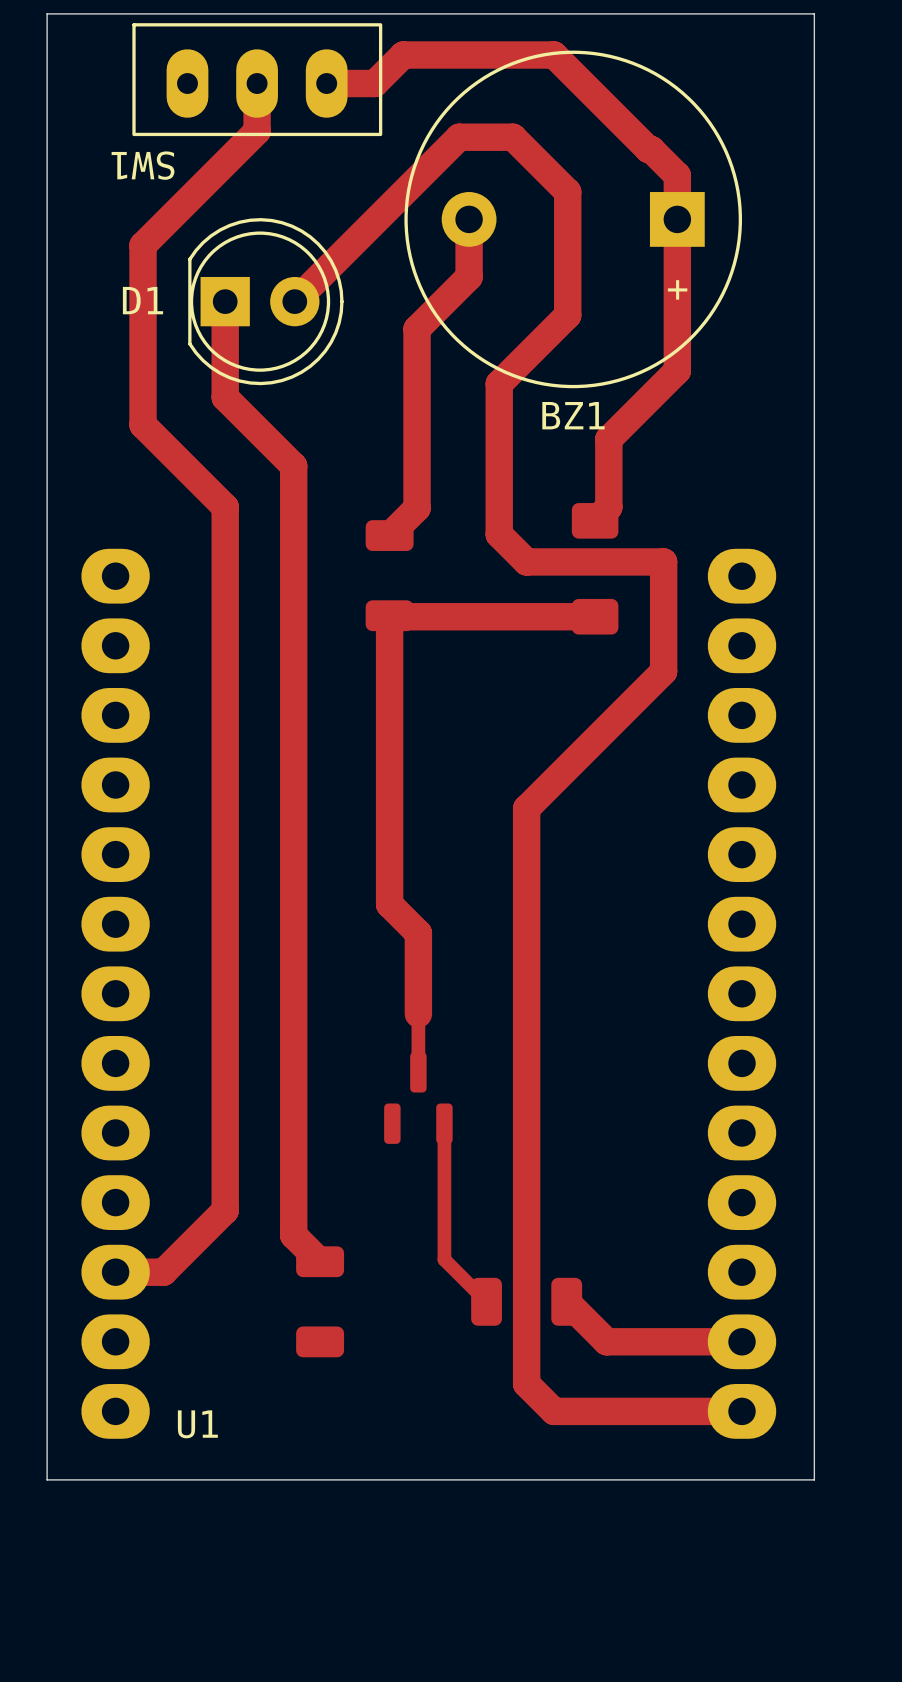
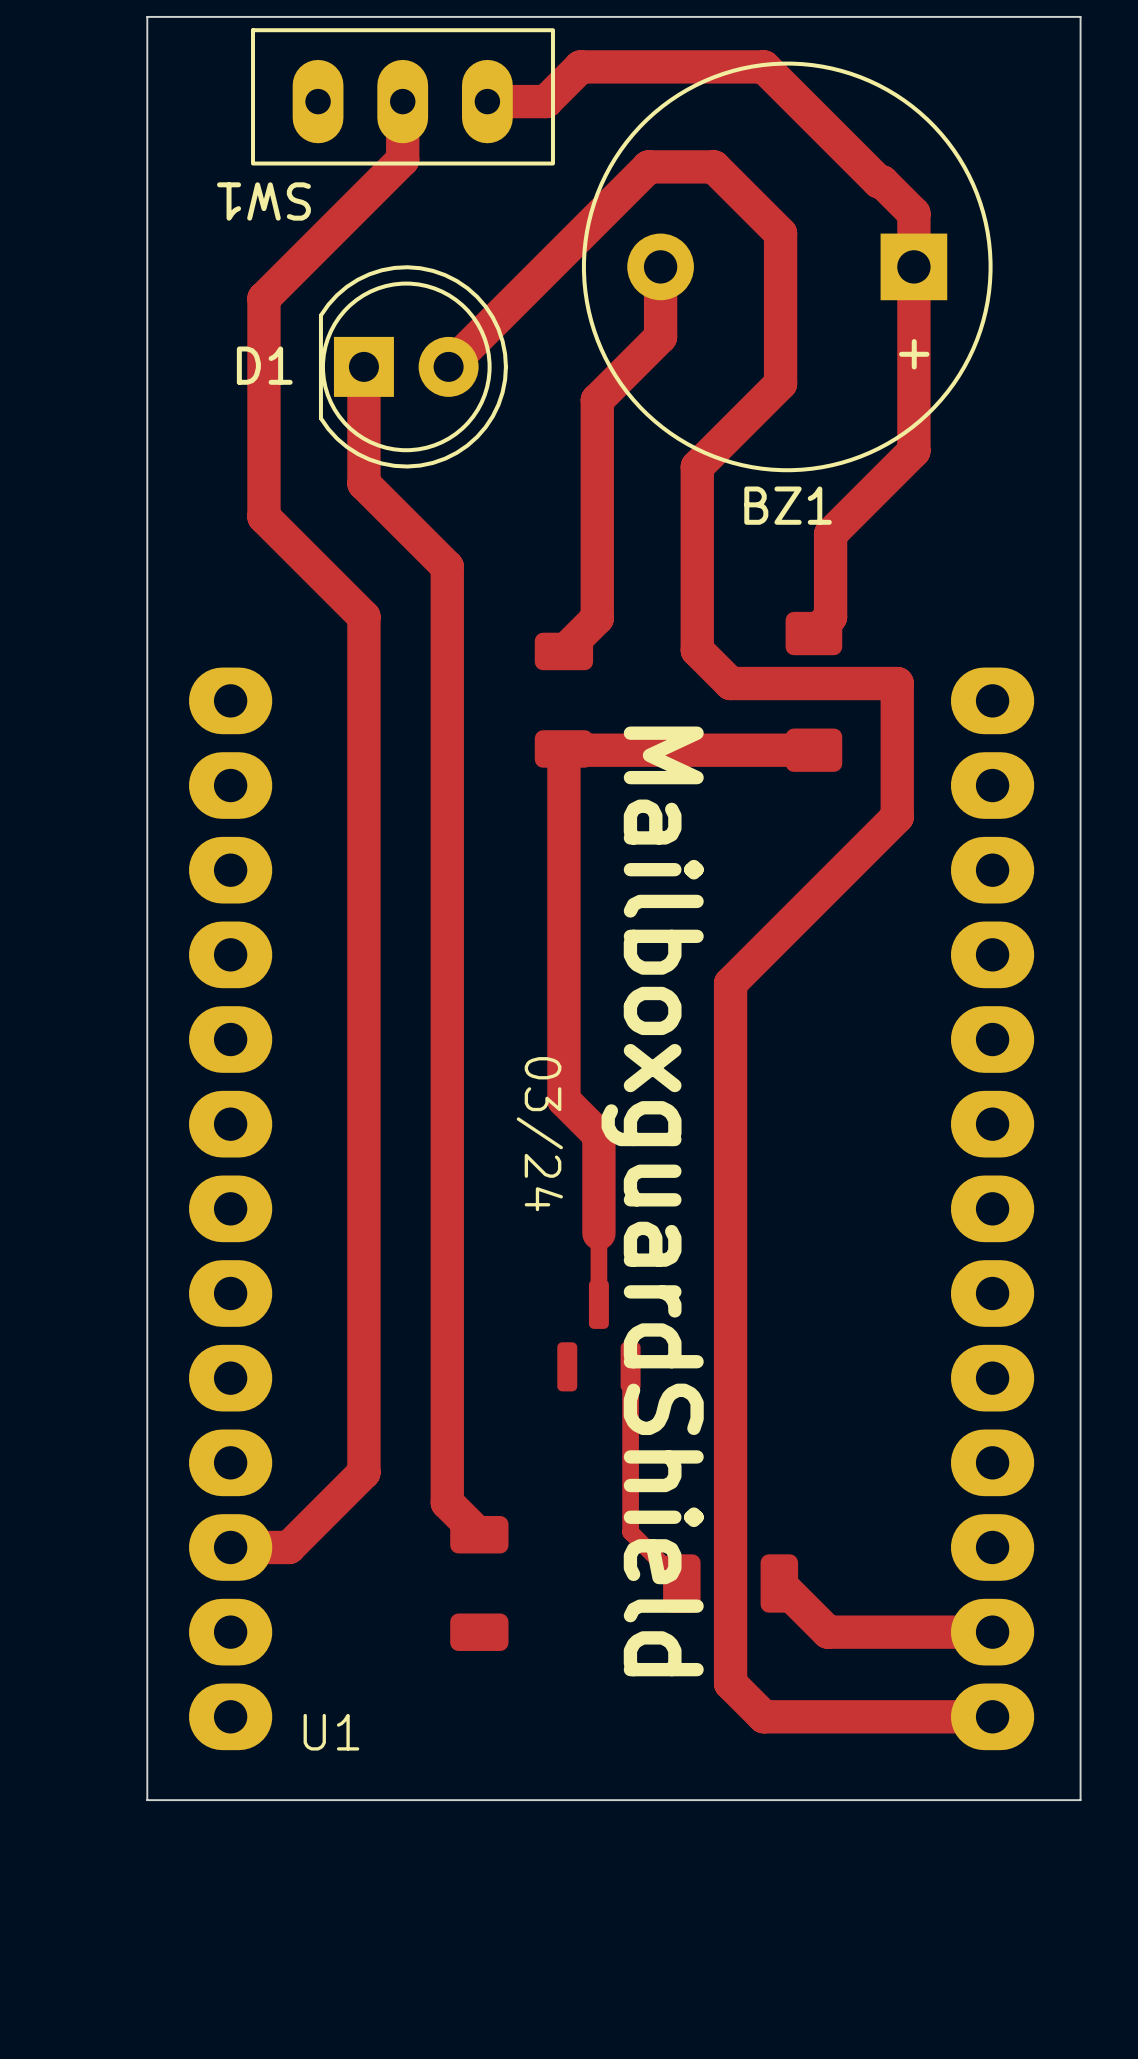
text: none -> 03/24 (539, 1134)
text: none -> MailboxguardShield (652, 1201)

